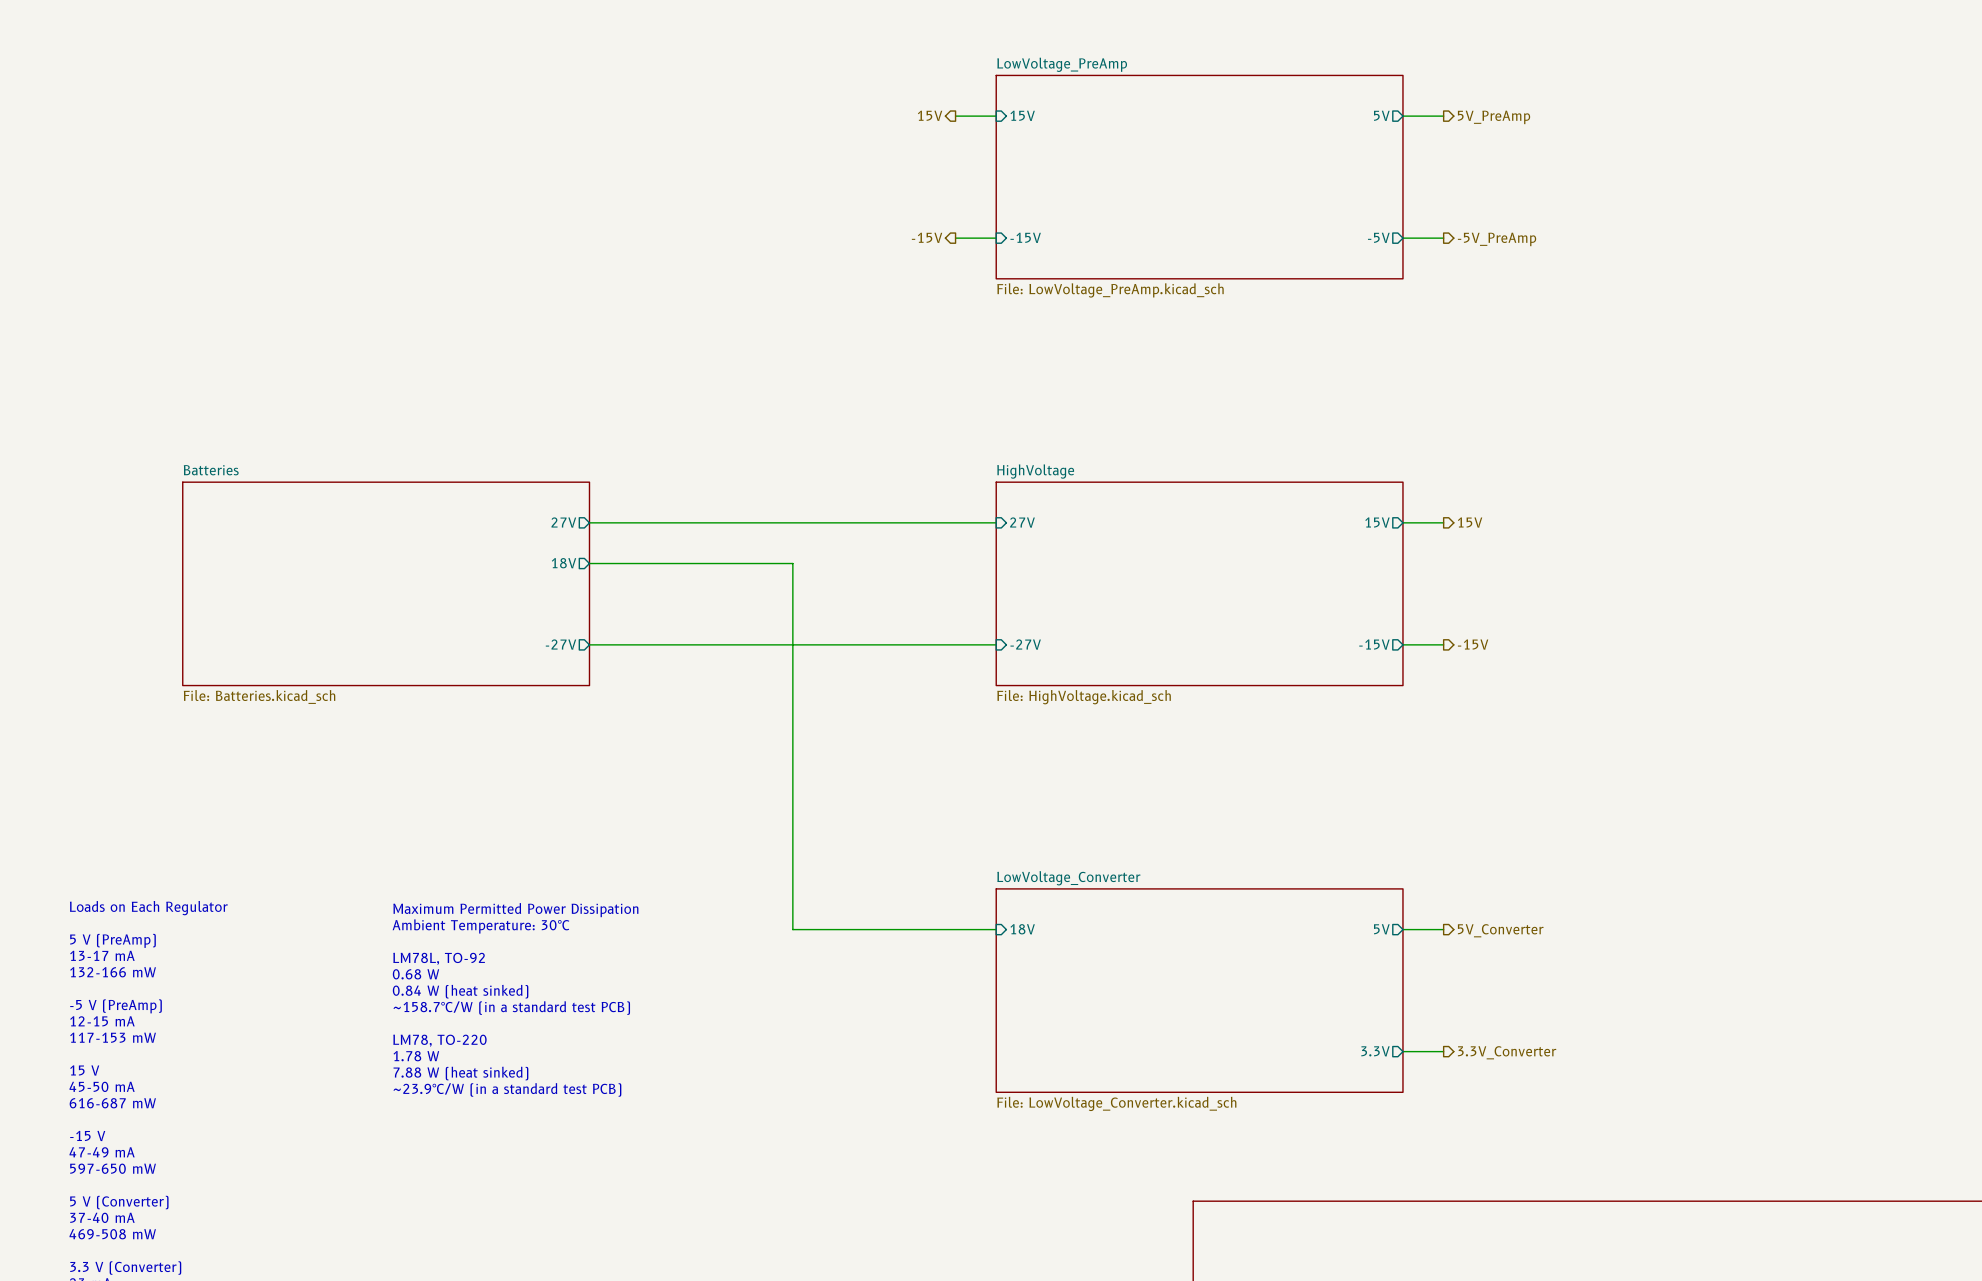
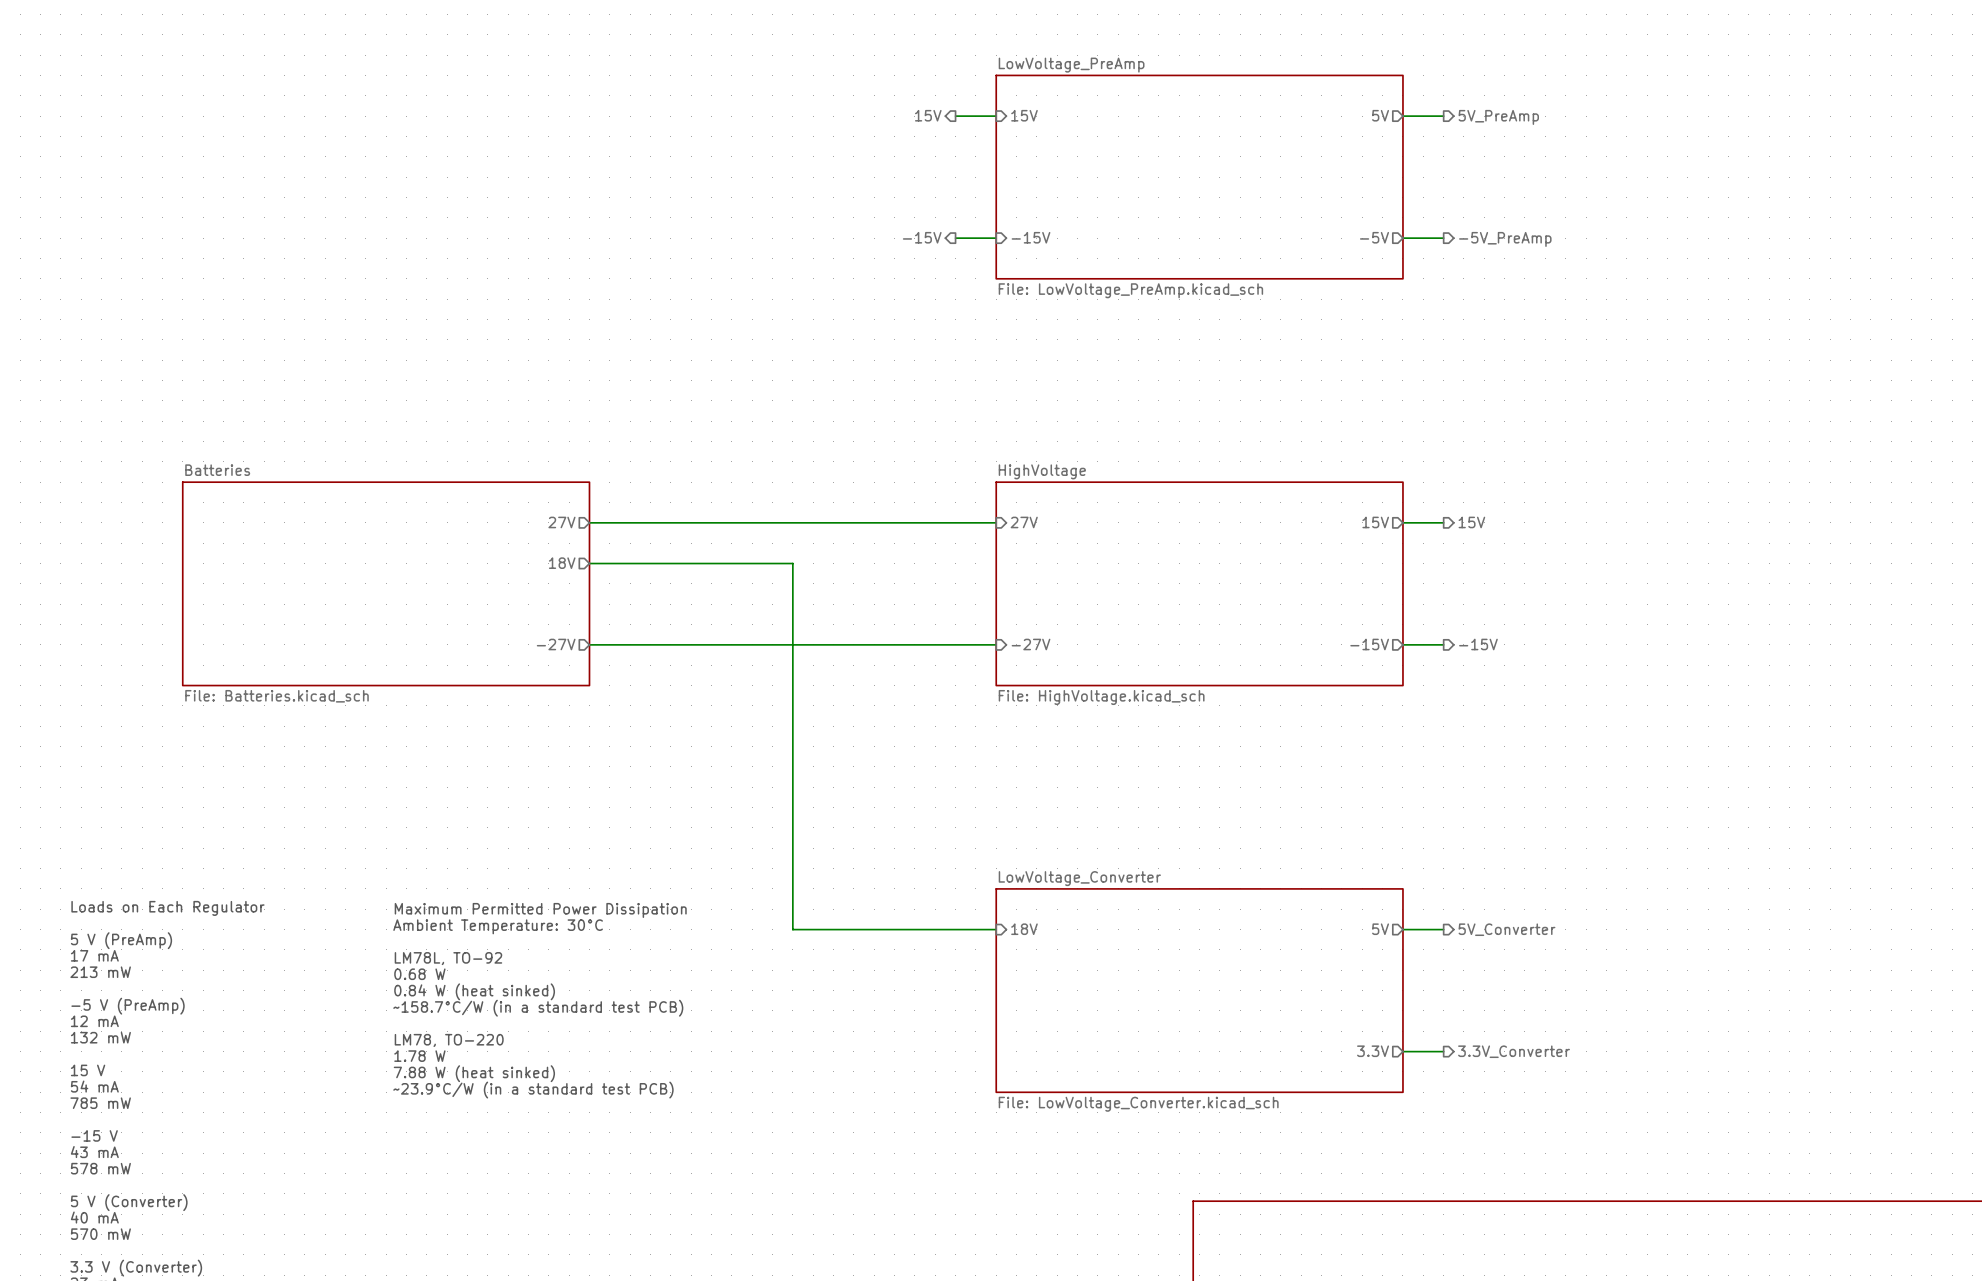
text: 13-17 mA (102, 955) -> 17 mA (94, 955)
text: 132-166 mW (113, 972) -> 213 mW (100, 972)
text: 12-15 mA (102, 1021) -> 12 mA (94, 1021)
text: 117-153 mW (113, 1037) -> 132 mW (100, 1037)
text: 45-50 mA (102, 1086) -> 54 mA (94, 1086)
text: 616-687 mW (112, 1103) -> 785 mW (100, 1103)
text: 47-49 mA (102, 1152) -> 43 mA (94, 1152)
text: 597-650 mW (113, 1168) -> 578 mW (100, 1168)
text: 37-40 mA (102, 1217) -> 40 mA (94, 1217)
text: 469-508 mW (112, 1234) -> 570 mW (100, 1234)

